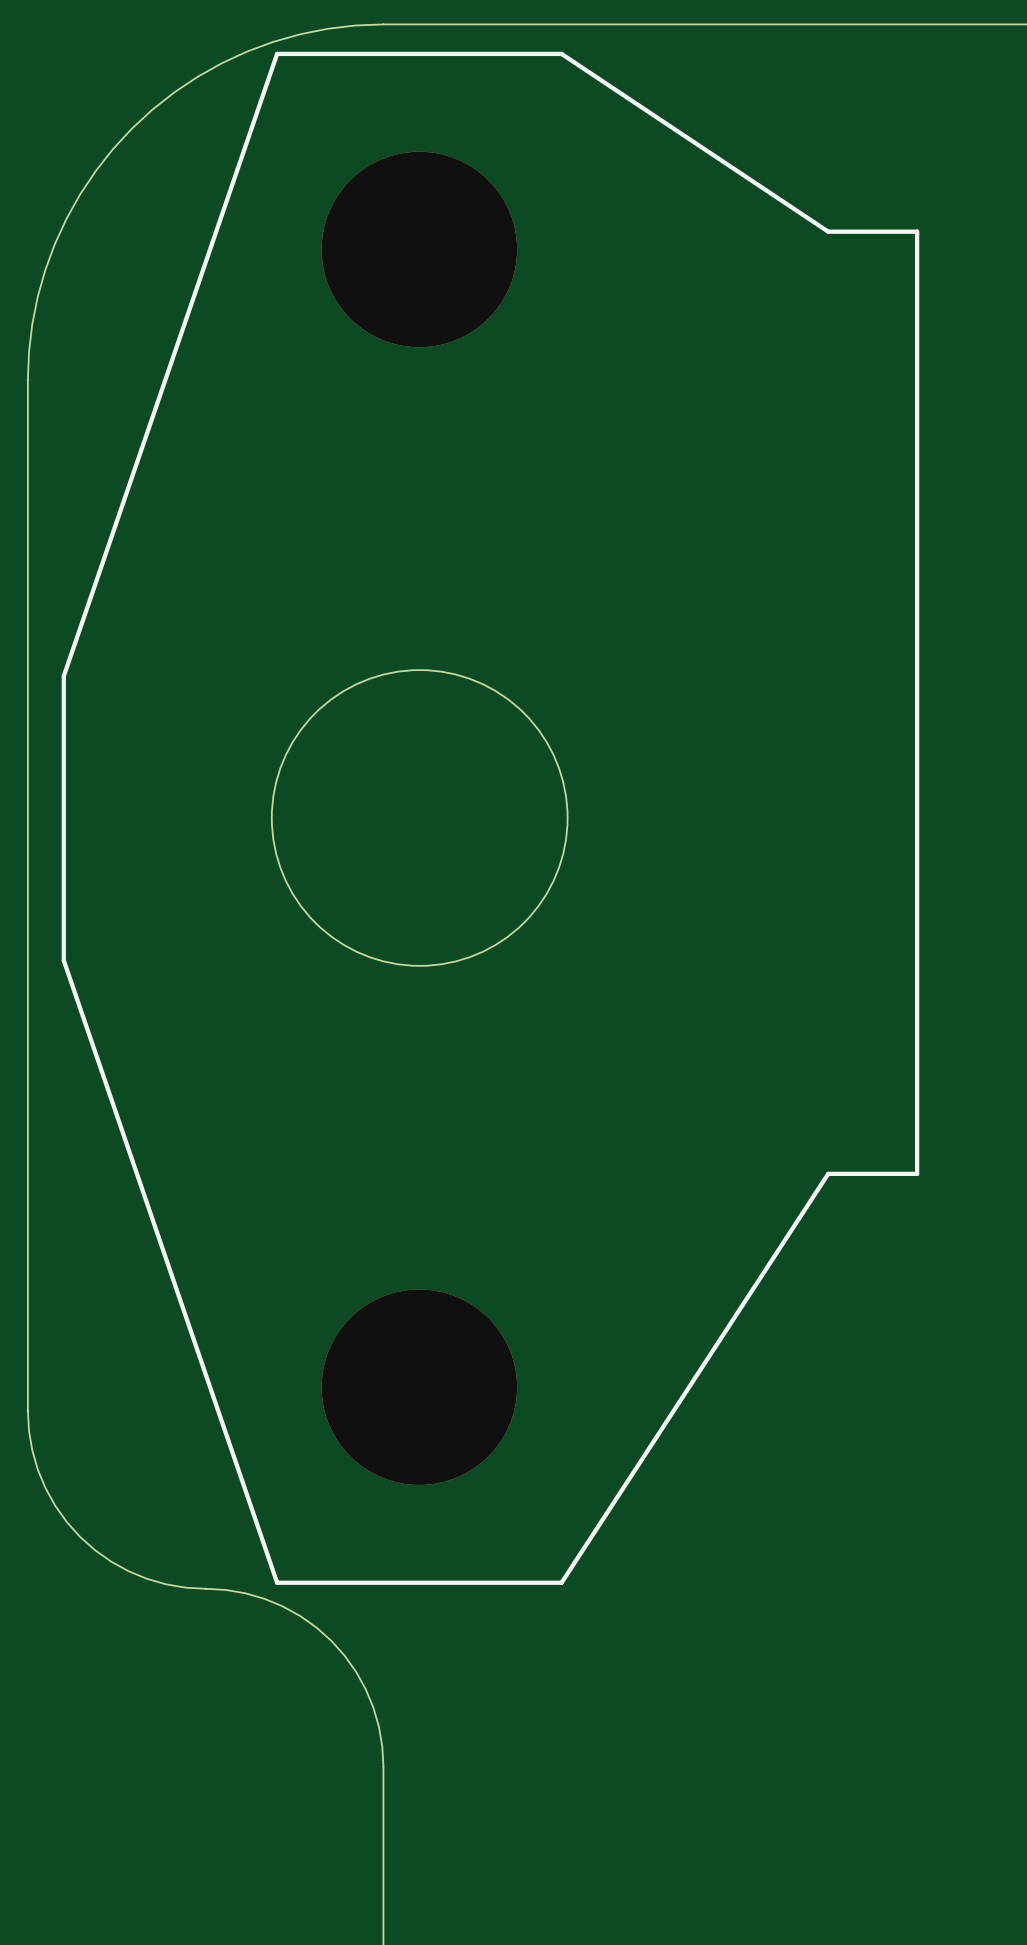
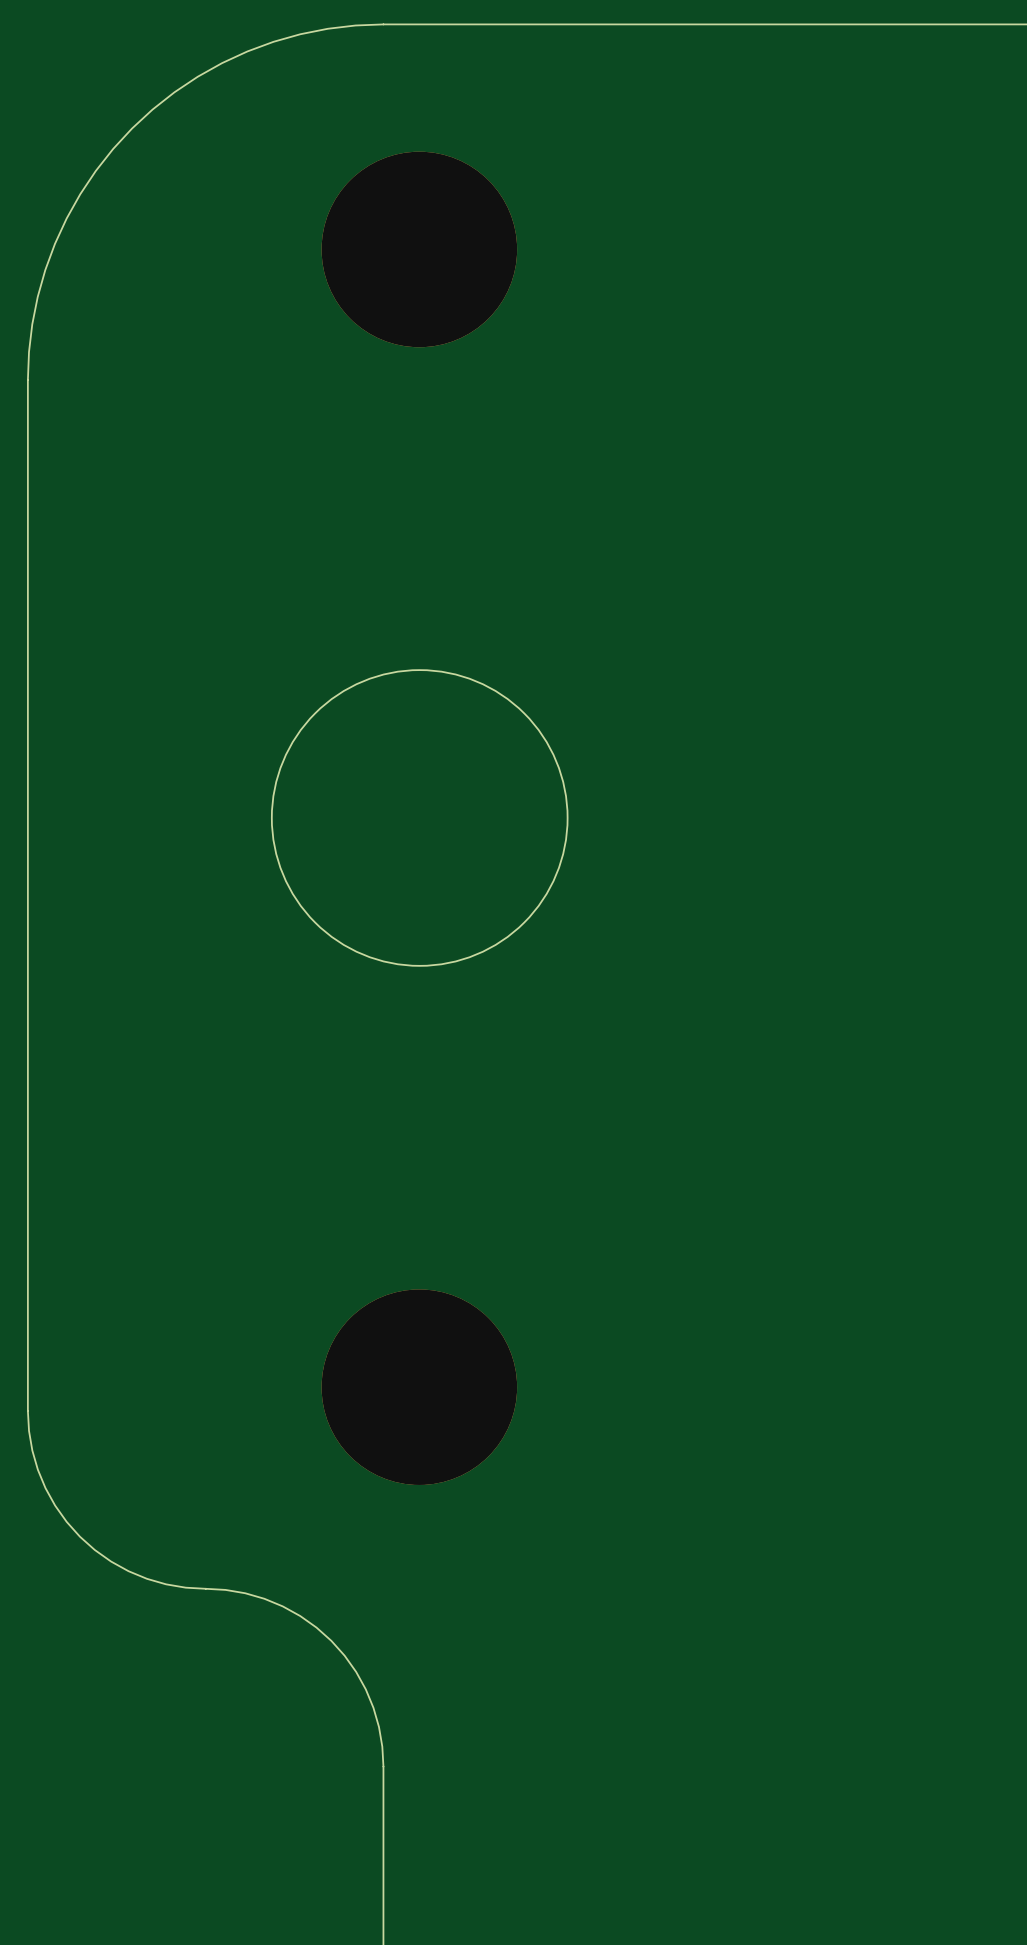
line: (561, 53) (828, 231) (917, 231) (917, 1173) (828, 1173) (561, 1582) (277, 1582) (63, 960) (63, 676) (277, 53) (561, 53) -> none

